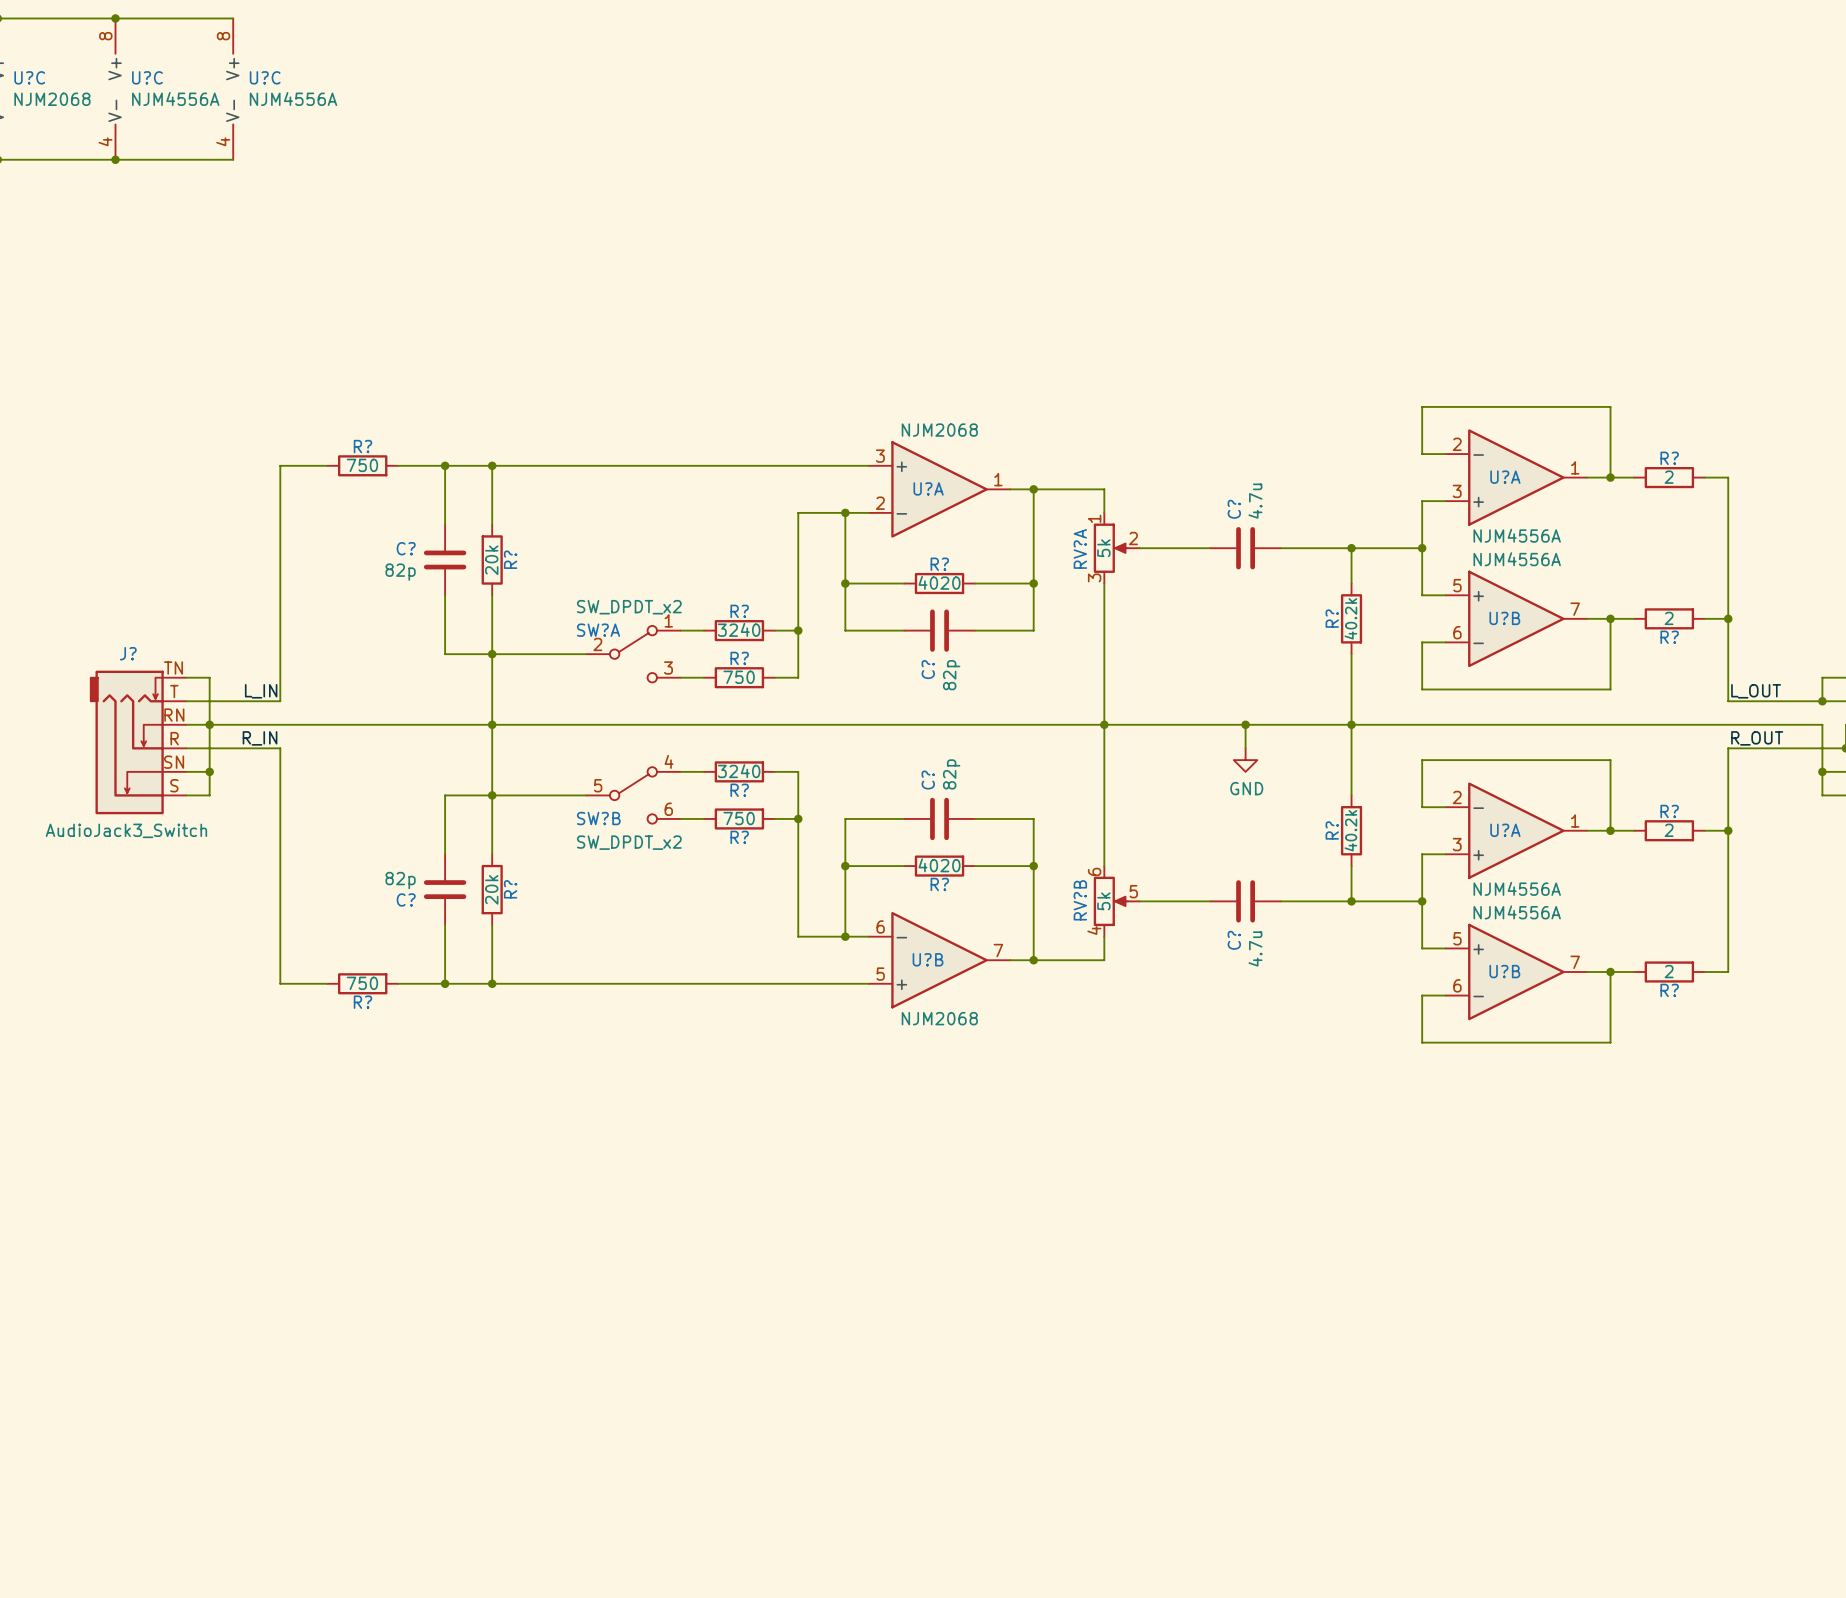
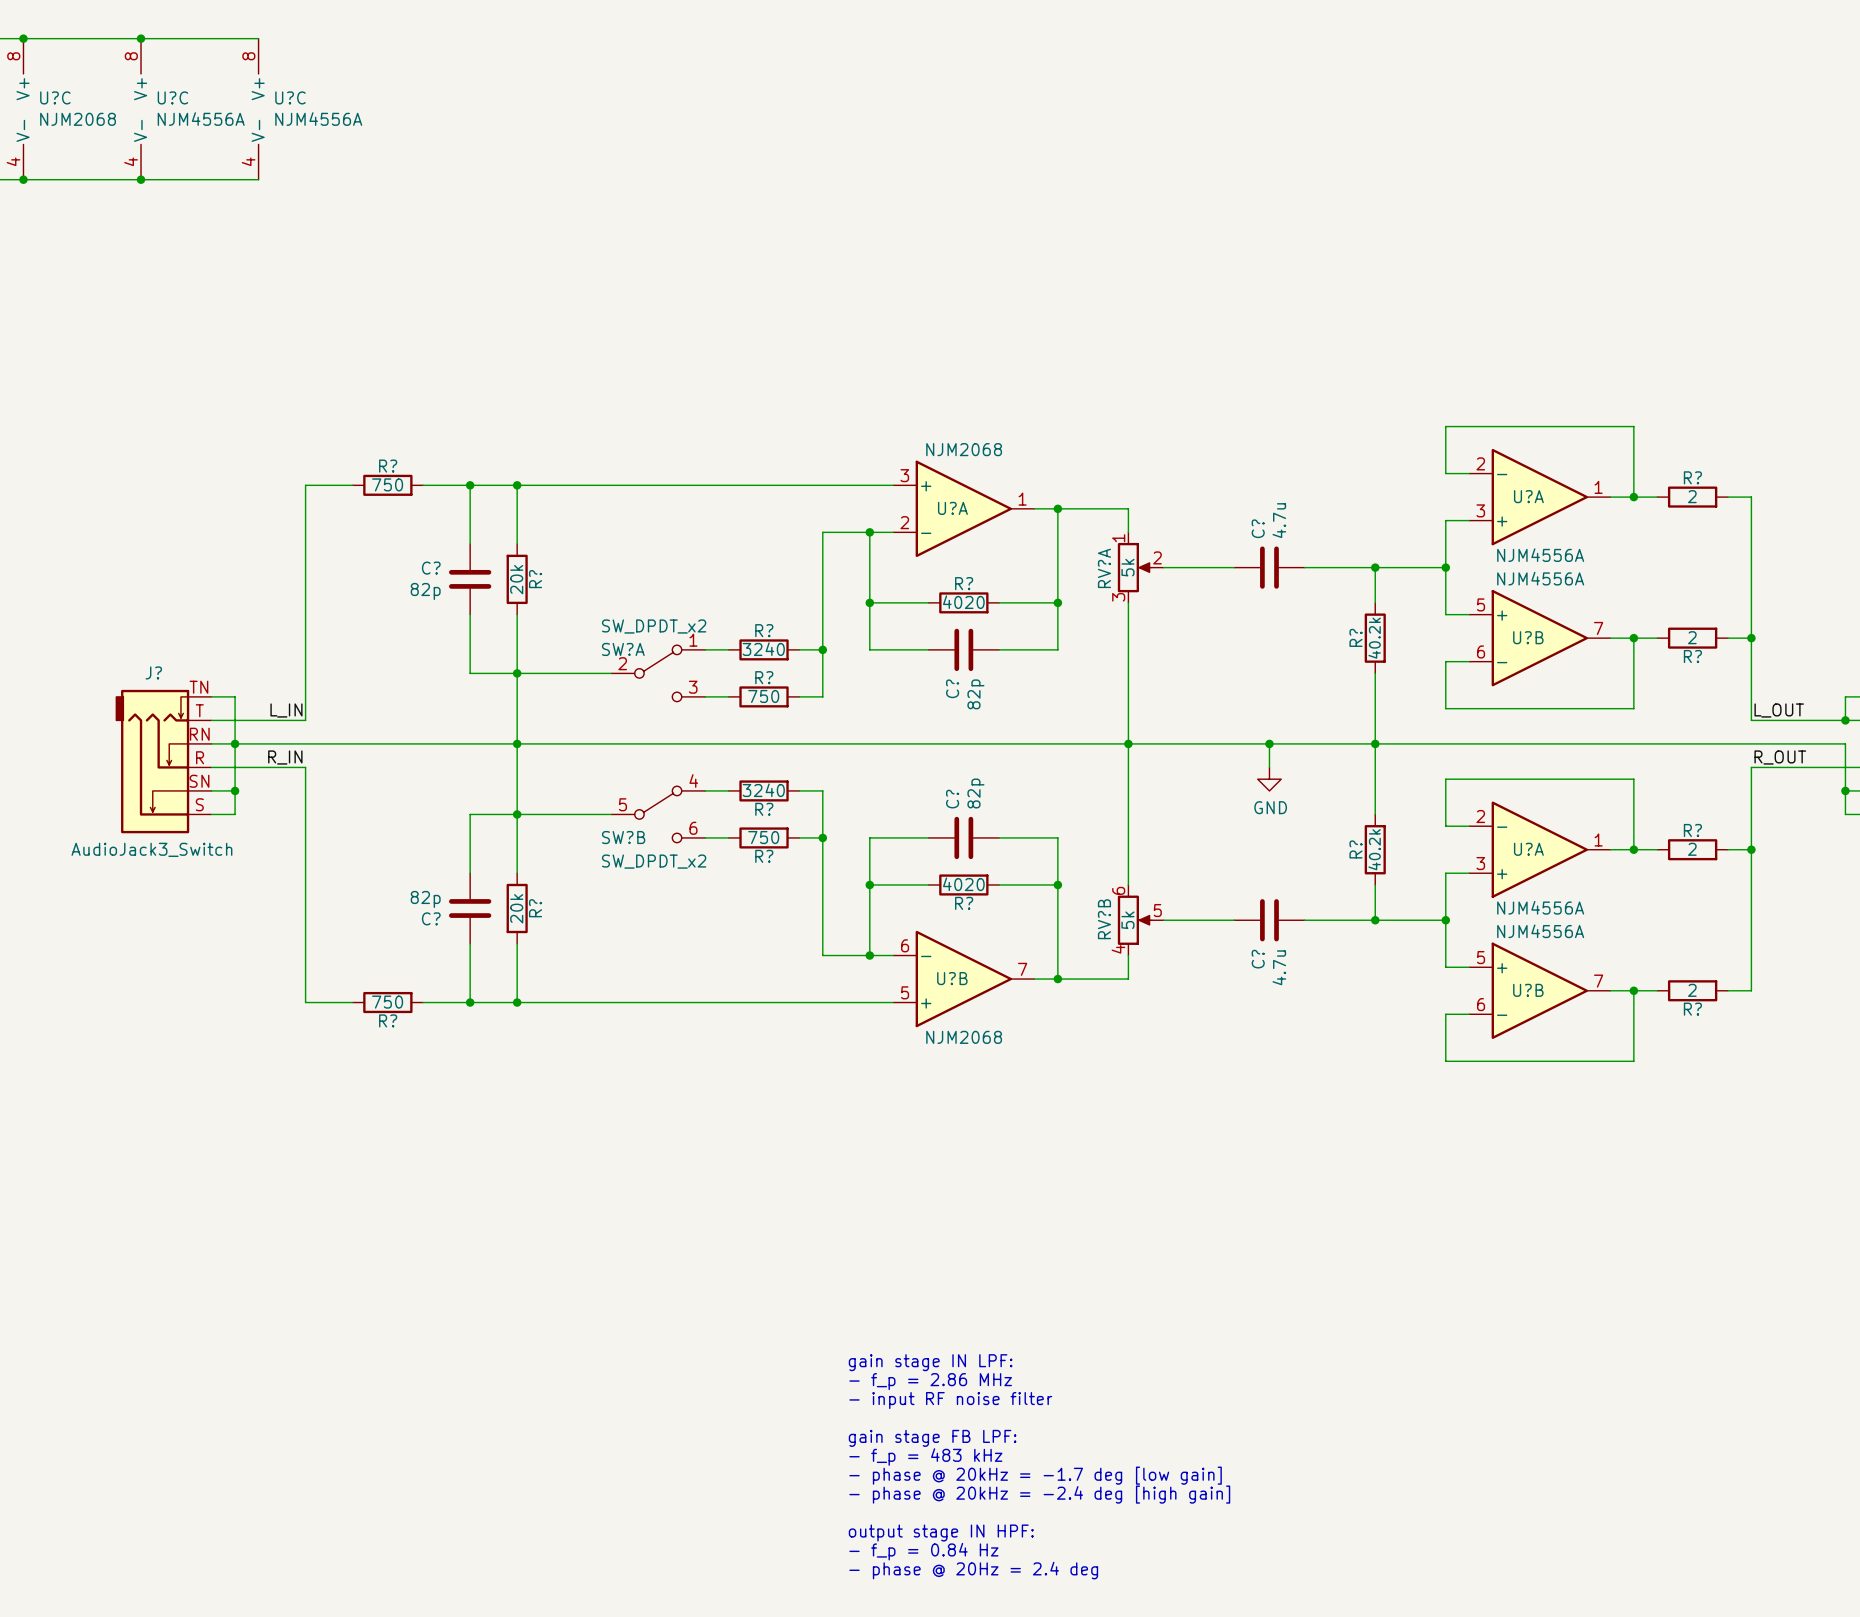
text: none -> gain stage IN LPF: (930, 1362)
text: none -> - f_p = 2.86 MHz (930, 1381)
text: none -> - input RF noise filter (950, 1400)
text: none -> gain stage FB LPF: (932, 1438)
text: none -> - f_p = 483 kHz (925, 1457)
text: none -> - phase @ 20kHz = -1.7 deg [low gain] (1035, 1475)
text: none -> - phase @ 20kHz = -2.4 deg [high gain] (1039, 1494)
text: none -> output stage IN HPF: (941, 1532)
text: none -> - f_p = 0.84 Hz (923, 1551)
text: none -> - phase @ 20Hz = 2.4 deg (973, 1570)

